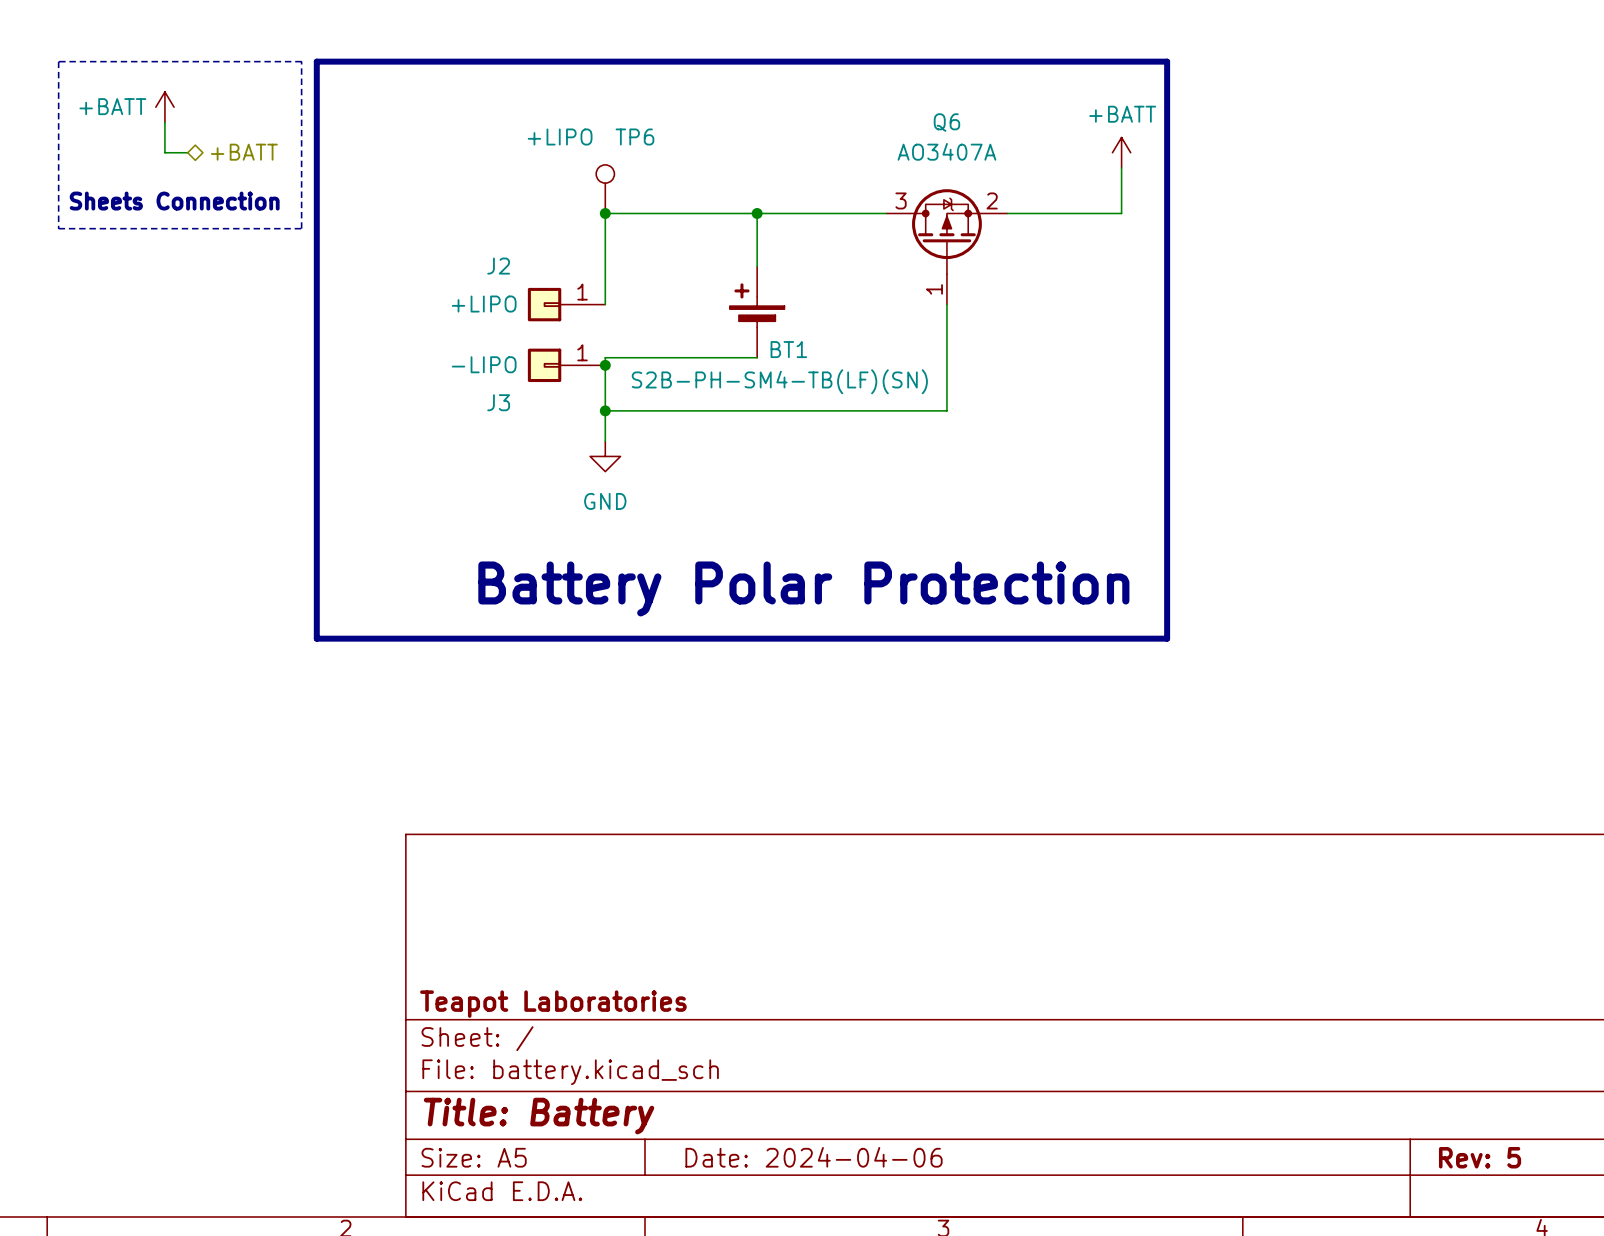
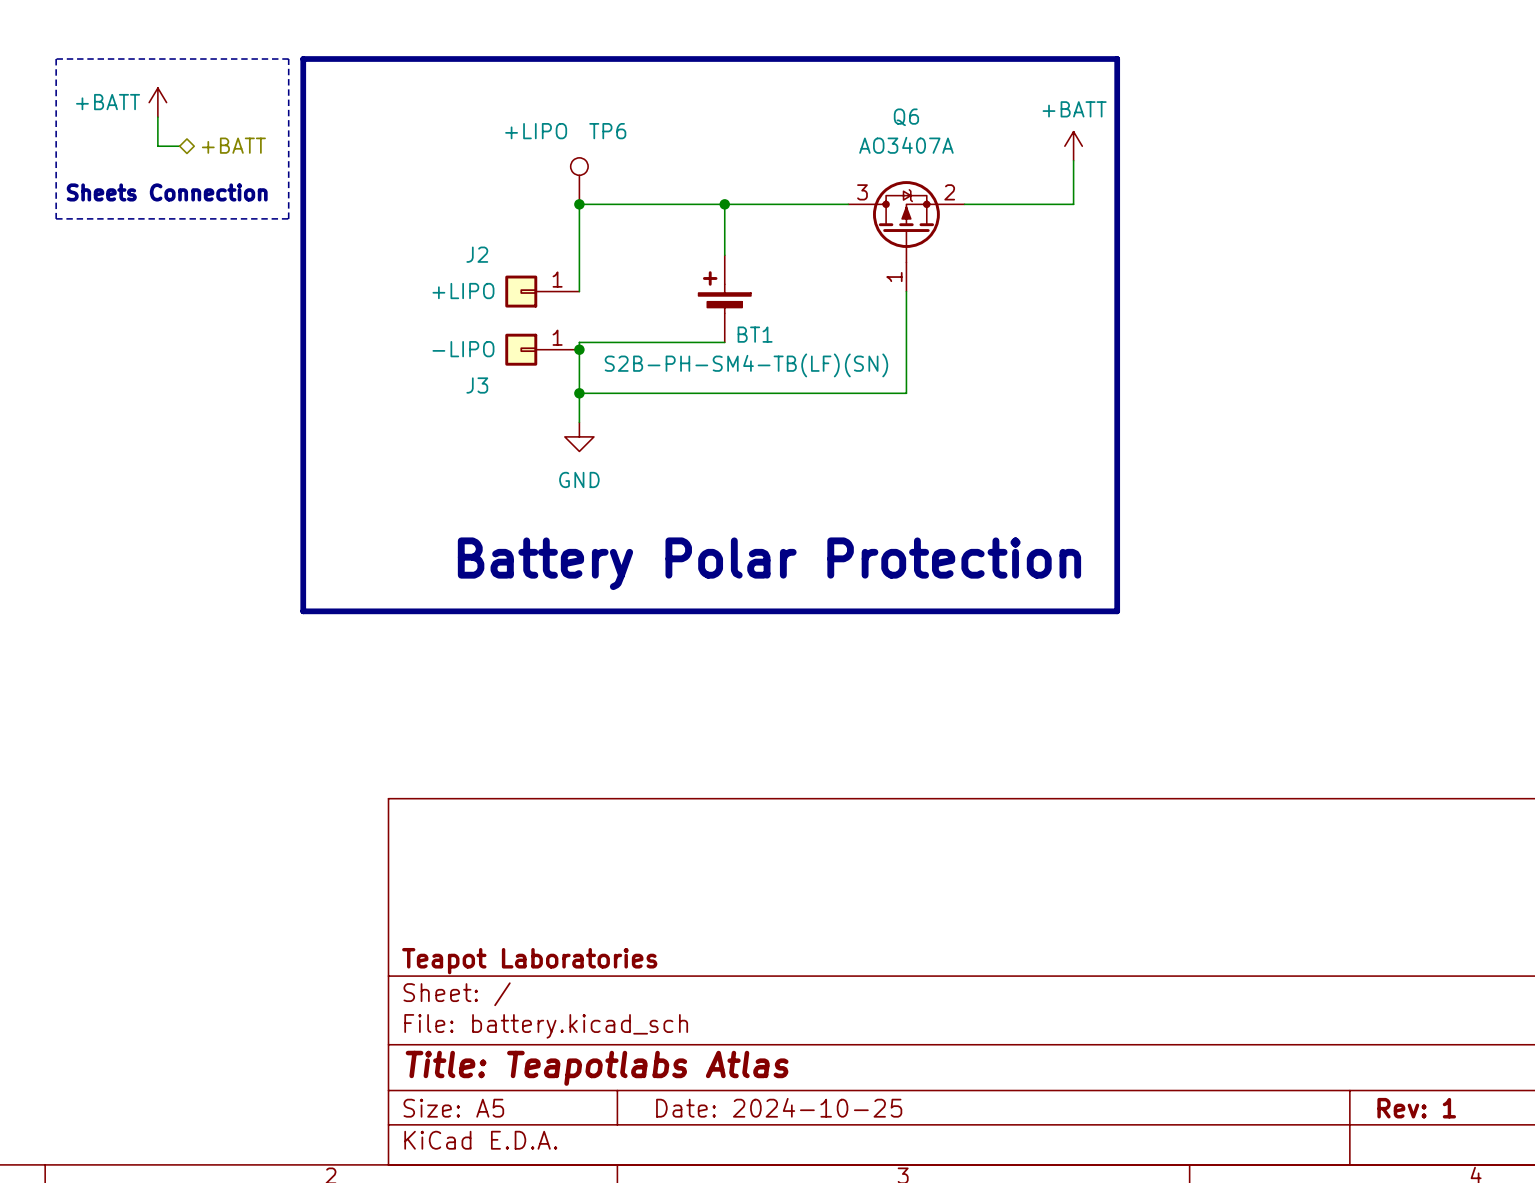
title block: Title: Battery (539, 1116) -> Title: Teapotlabs Atlas (597, 1068)
title block: Date: 2024-04-06 (814, 1157) -> Date: 2024-10-25 (779, 1107)
title block: Rev: 5 (1480, 1157) -> Rev: 1 (1416, 1108)

